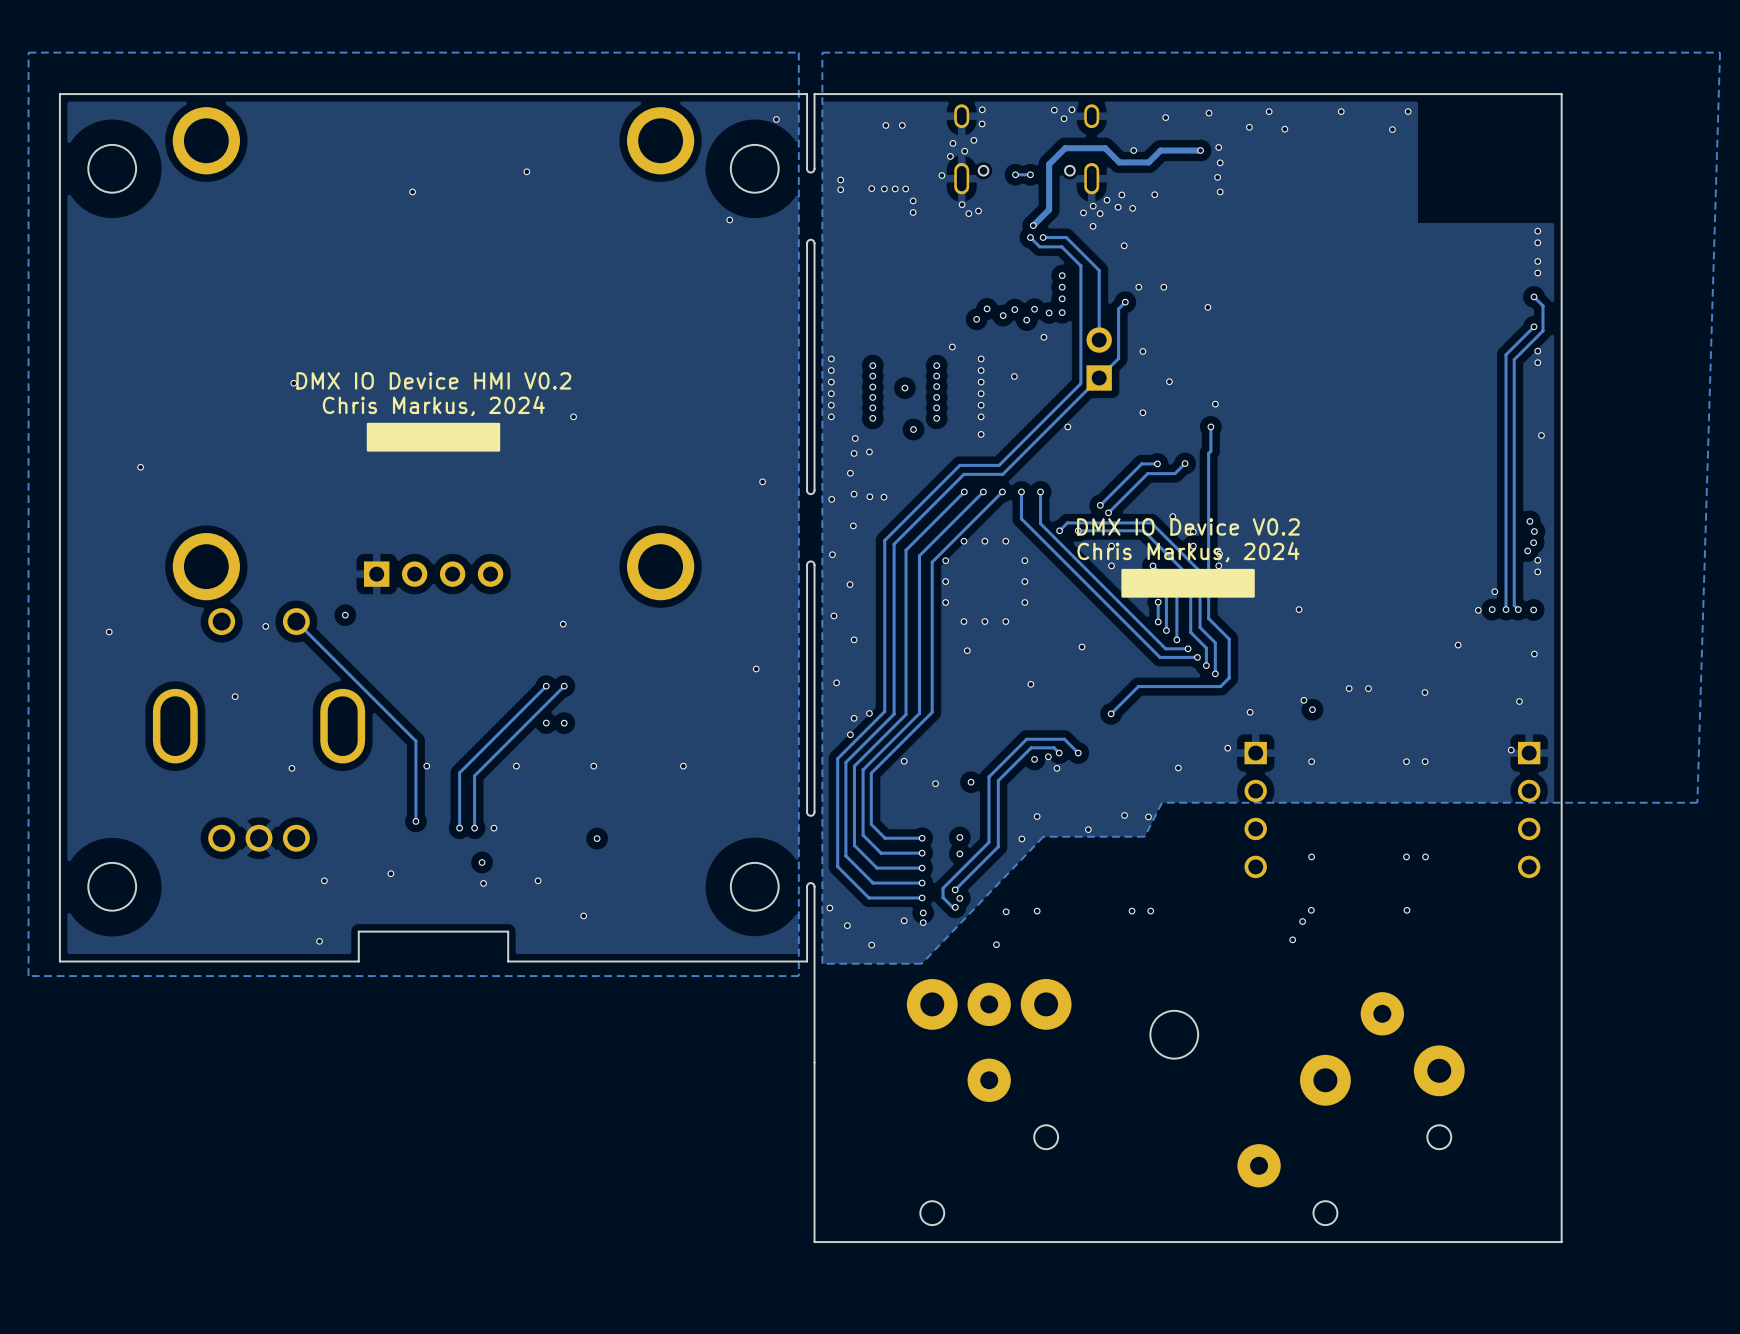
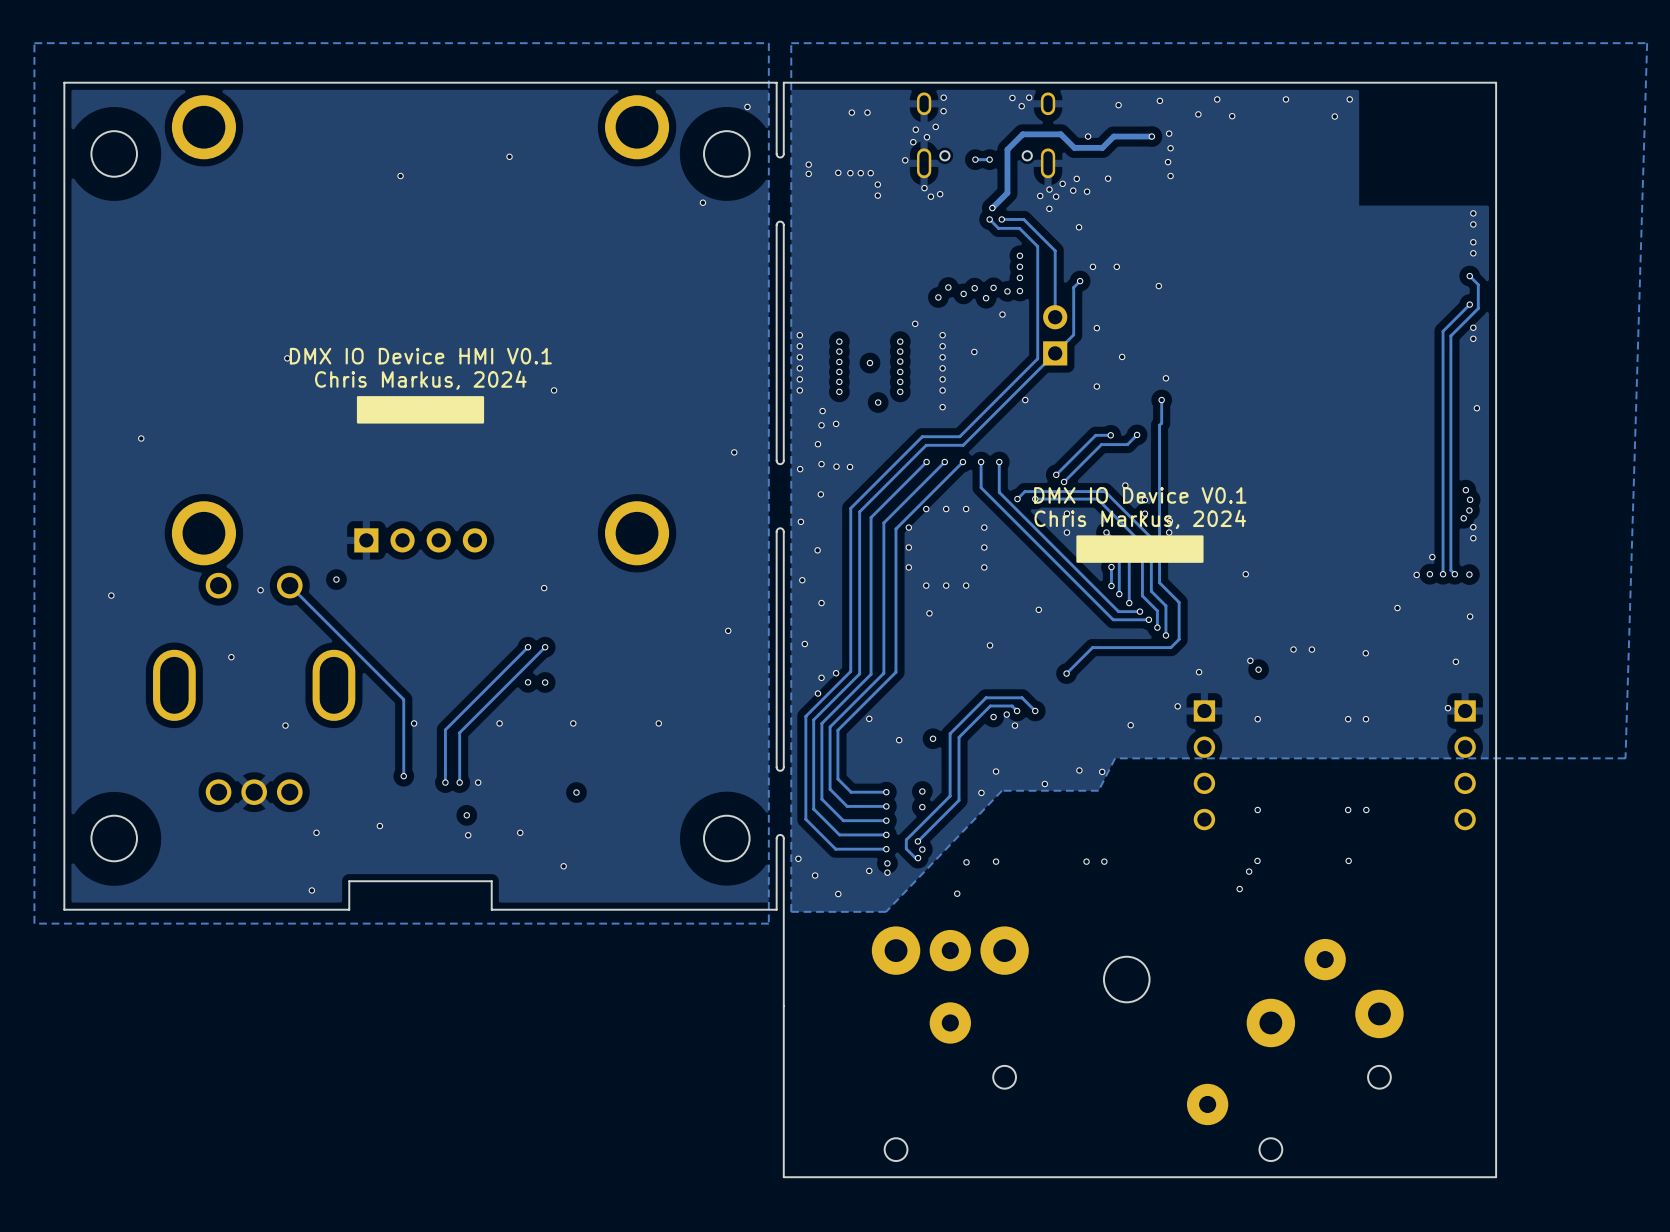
text: DMX IO Device HMI V0.2 (433, 380) -> DMX IO Device HMI V0.1 (420, 356)
text: DMX IO Device V0.2 (1188, 526) -> DMX IO Device V0.1 (1140, 495)

